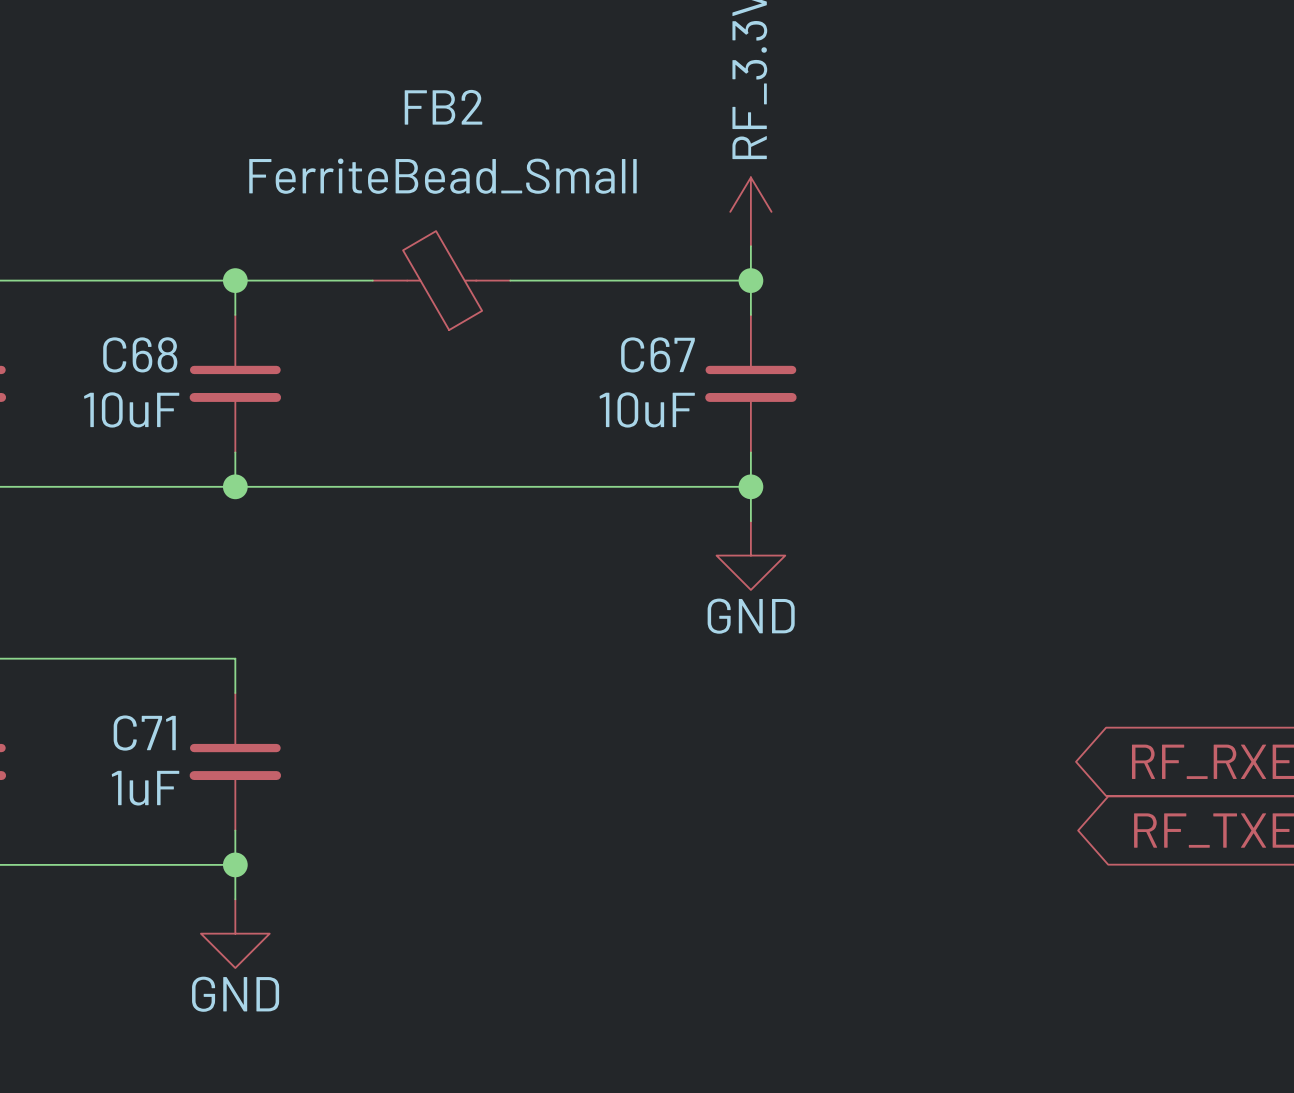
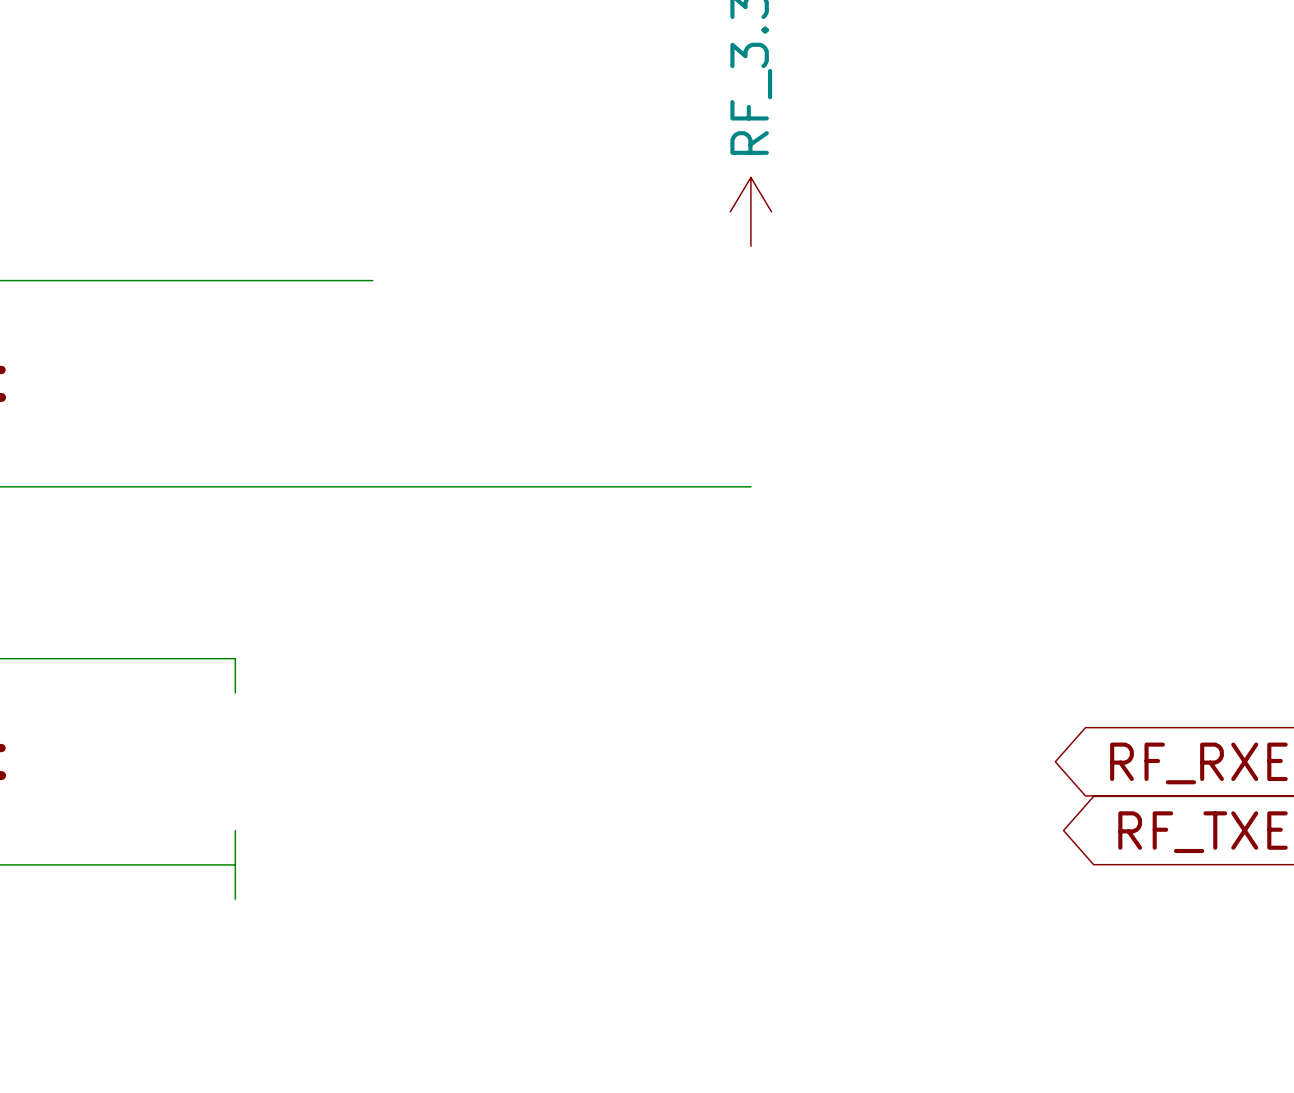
wire: (750, 246) (750, 314) -> none
wire: (235, 280) (235, 314) -> none
junction: (235, 280) -> none
FB2: FerriteBead_Small (441, 280) -> none
wire: (510, 280) (750, 280) -> none
junction: (750, 280) -> none
C68: 10uF (235, 383) -> none
C67: 10uF (750, 383) -> none
wire: (235, 452) (235, 486) -> none
wire: (750, 452) (750, 521) -> none
junction: (235, 486) -> none
junction: (750, 486) -> none
power symbol: GND (750, 555) -> none
C71: 1uF (235, 761) -> none
junction: (235, 864) -> none
power symbol: GND (235, 933) -> none

